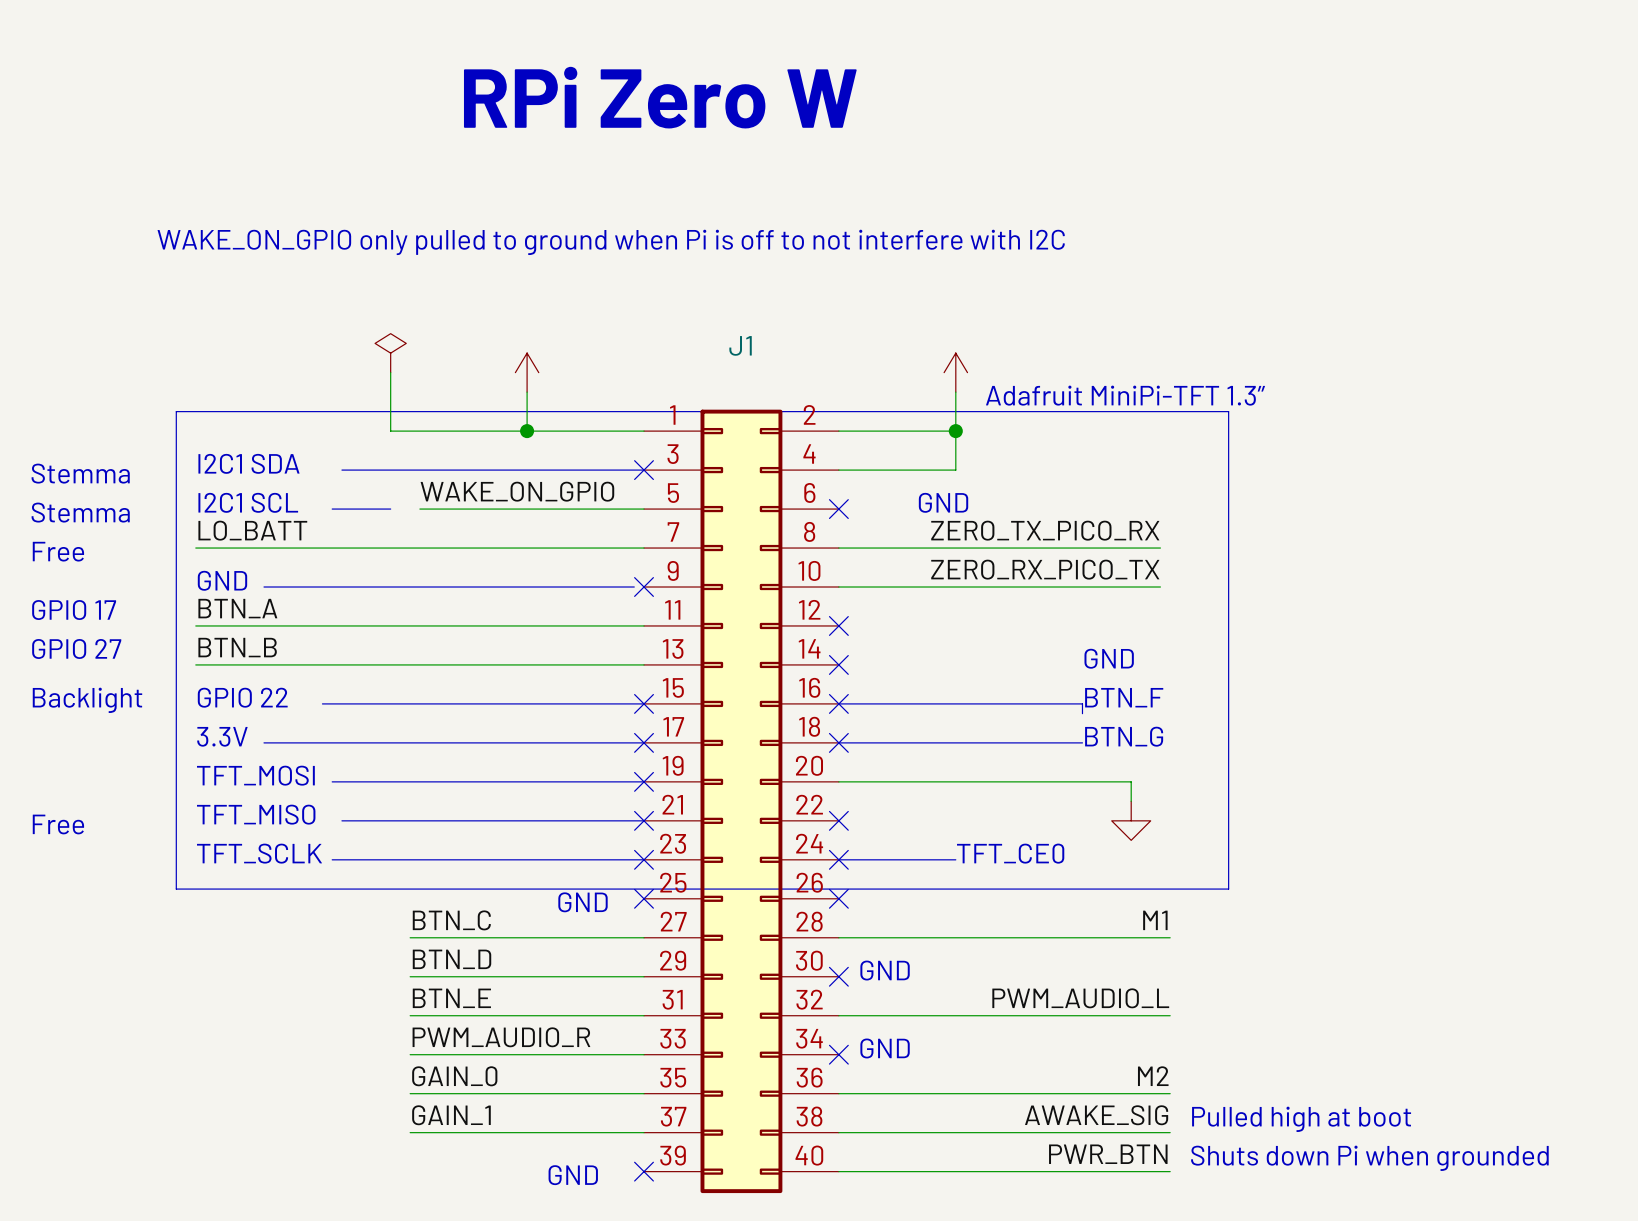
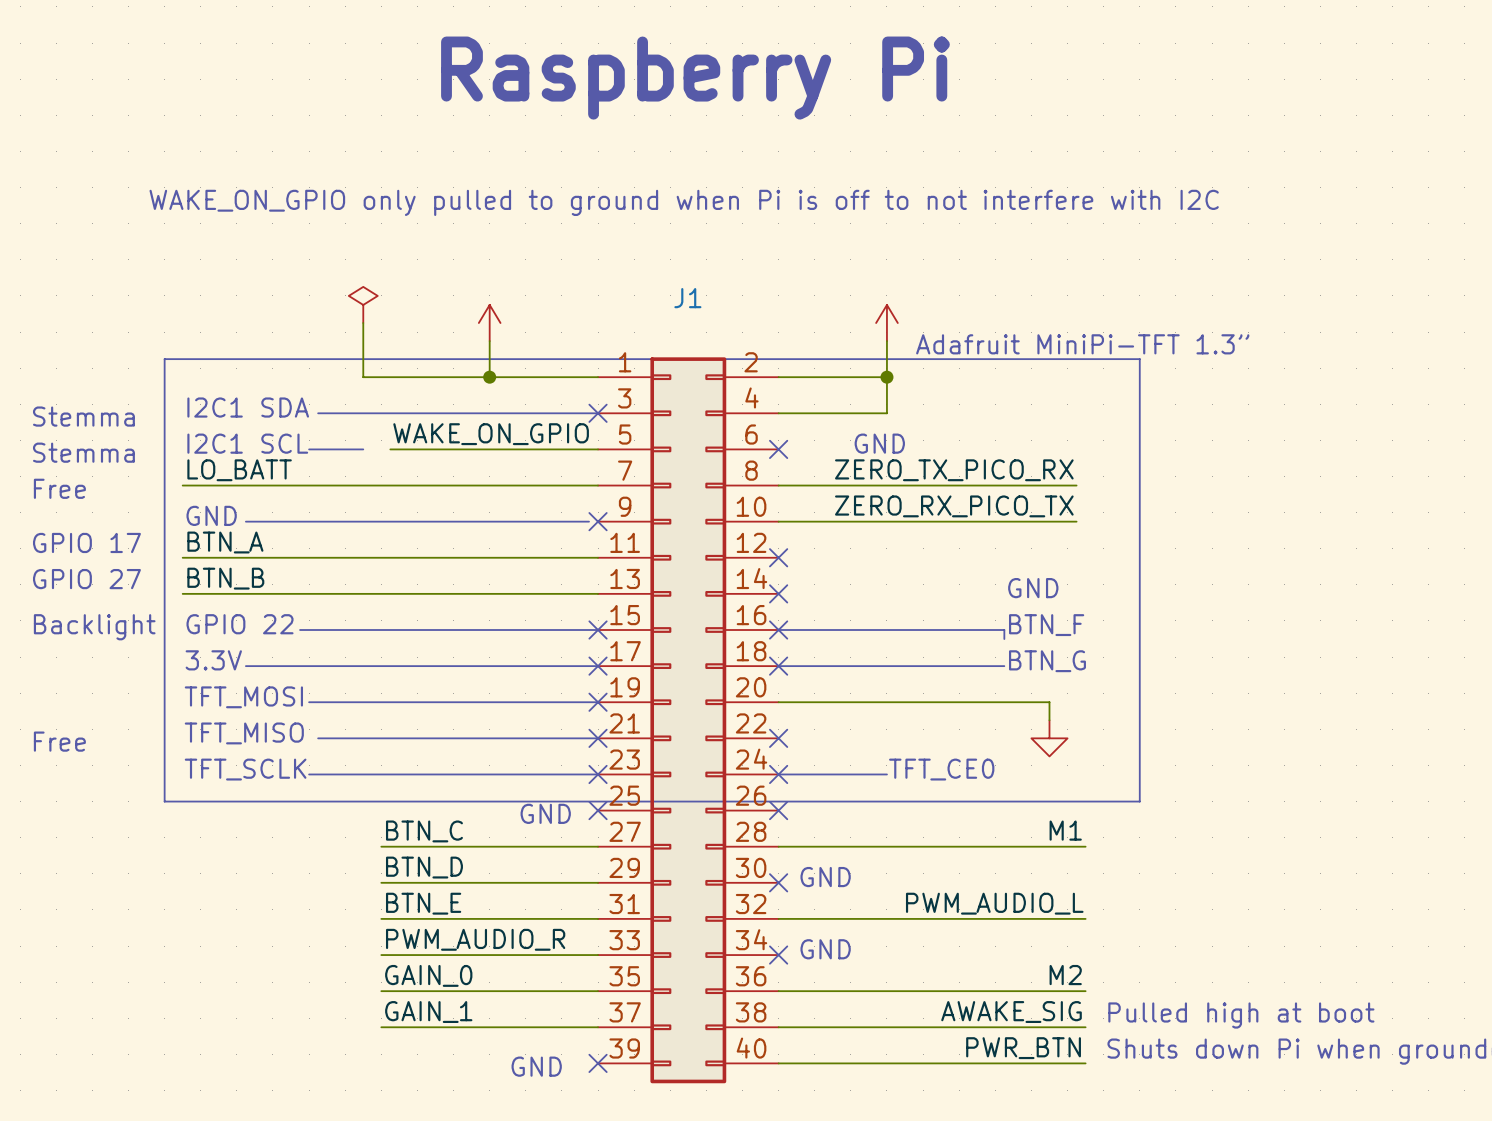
text: RPi Zero W (660, 97) -> Raspberry Pi (695, 78)

